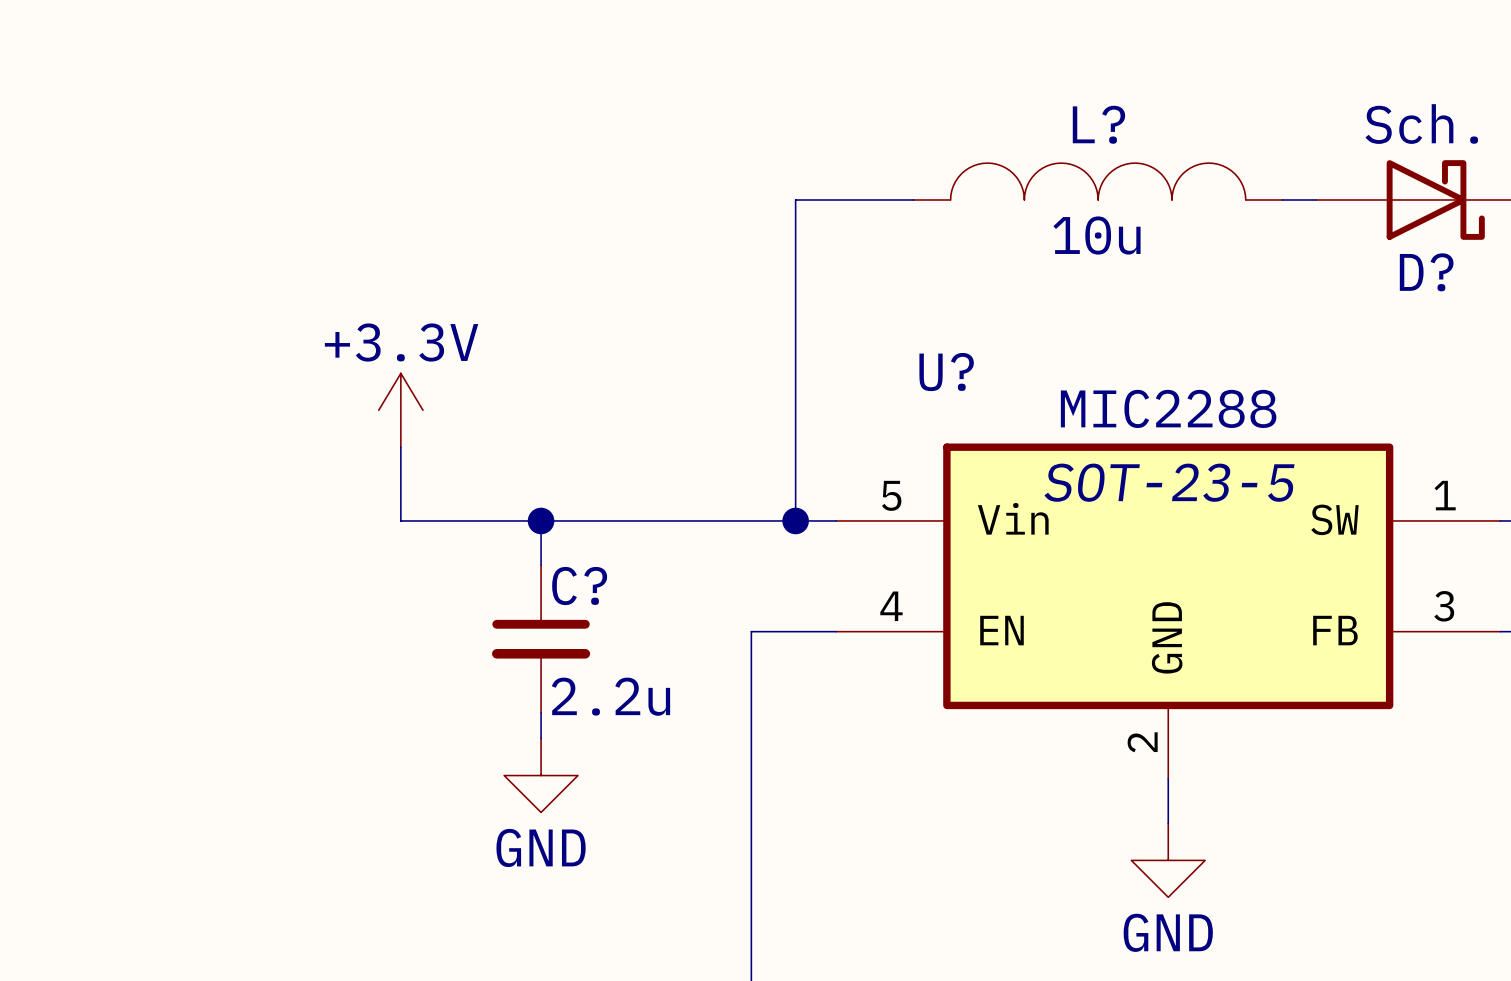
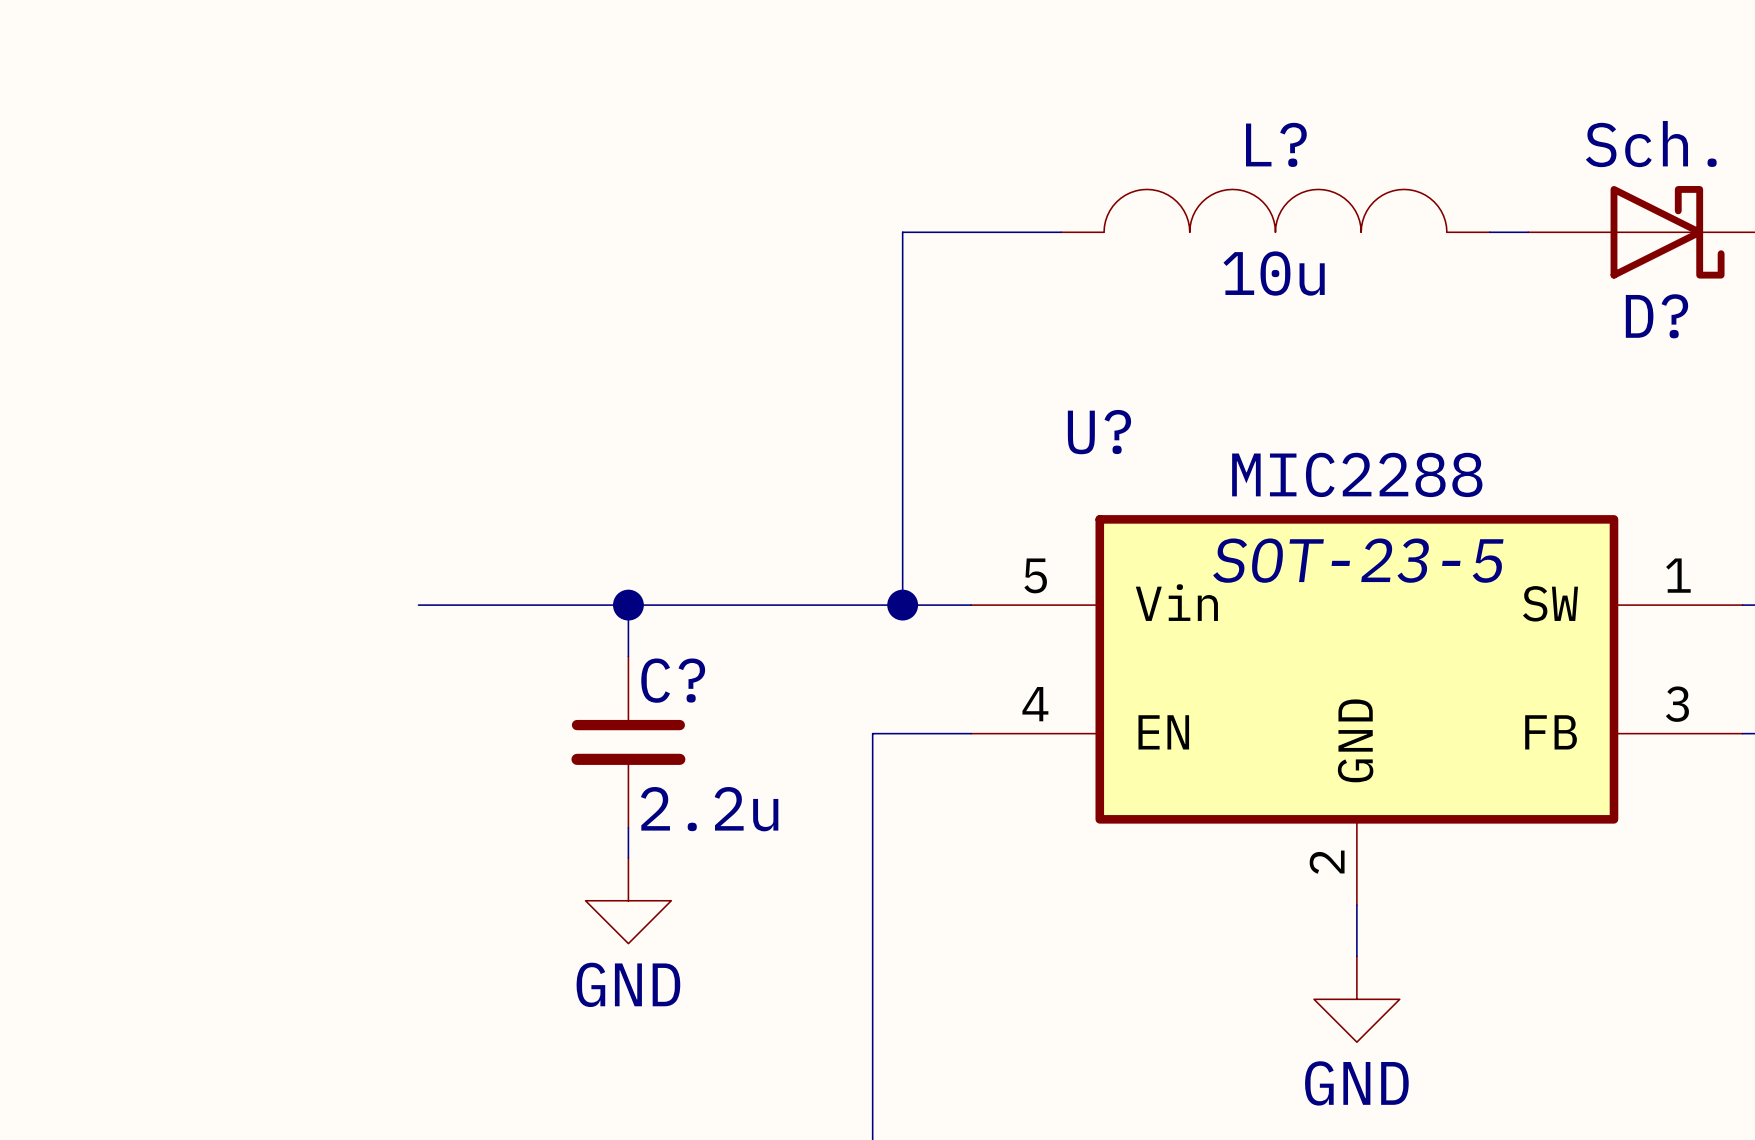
wire: (795, 199) (795, 520) -> (924, 232) (902, 232) (902, 605)
power symbol: +3.3V (400, 410) -> none
wire: (400, 447) (400, 520) -> (418, 605) (465, 605)
junction position: (795, 520) -> (902, 605)

